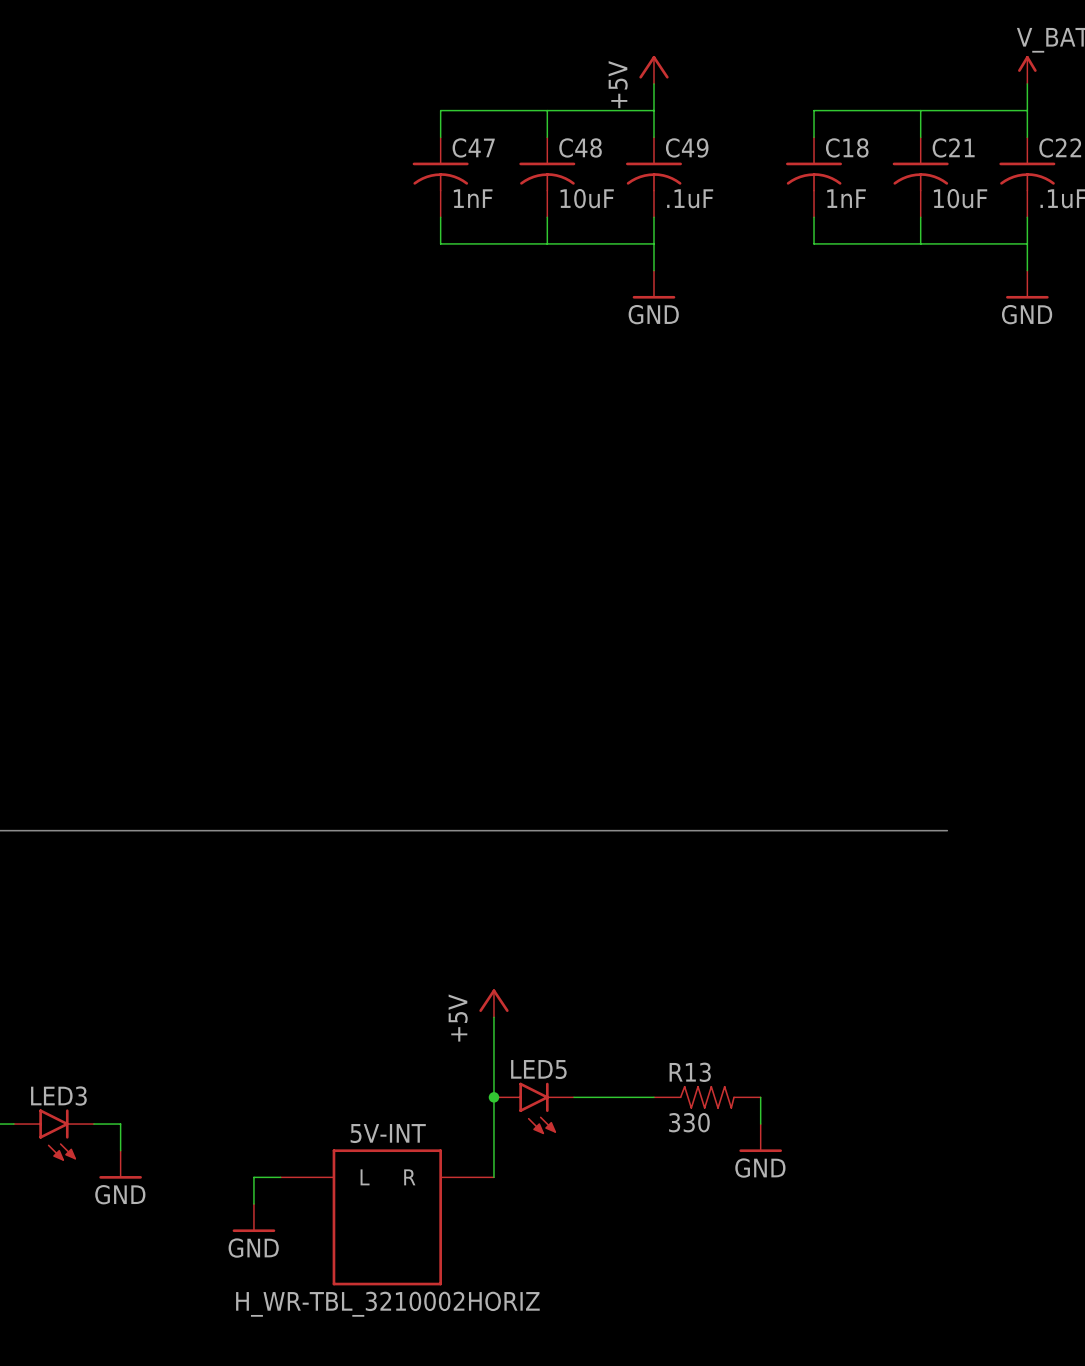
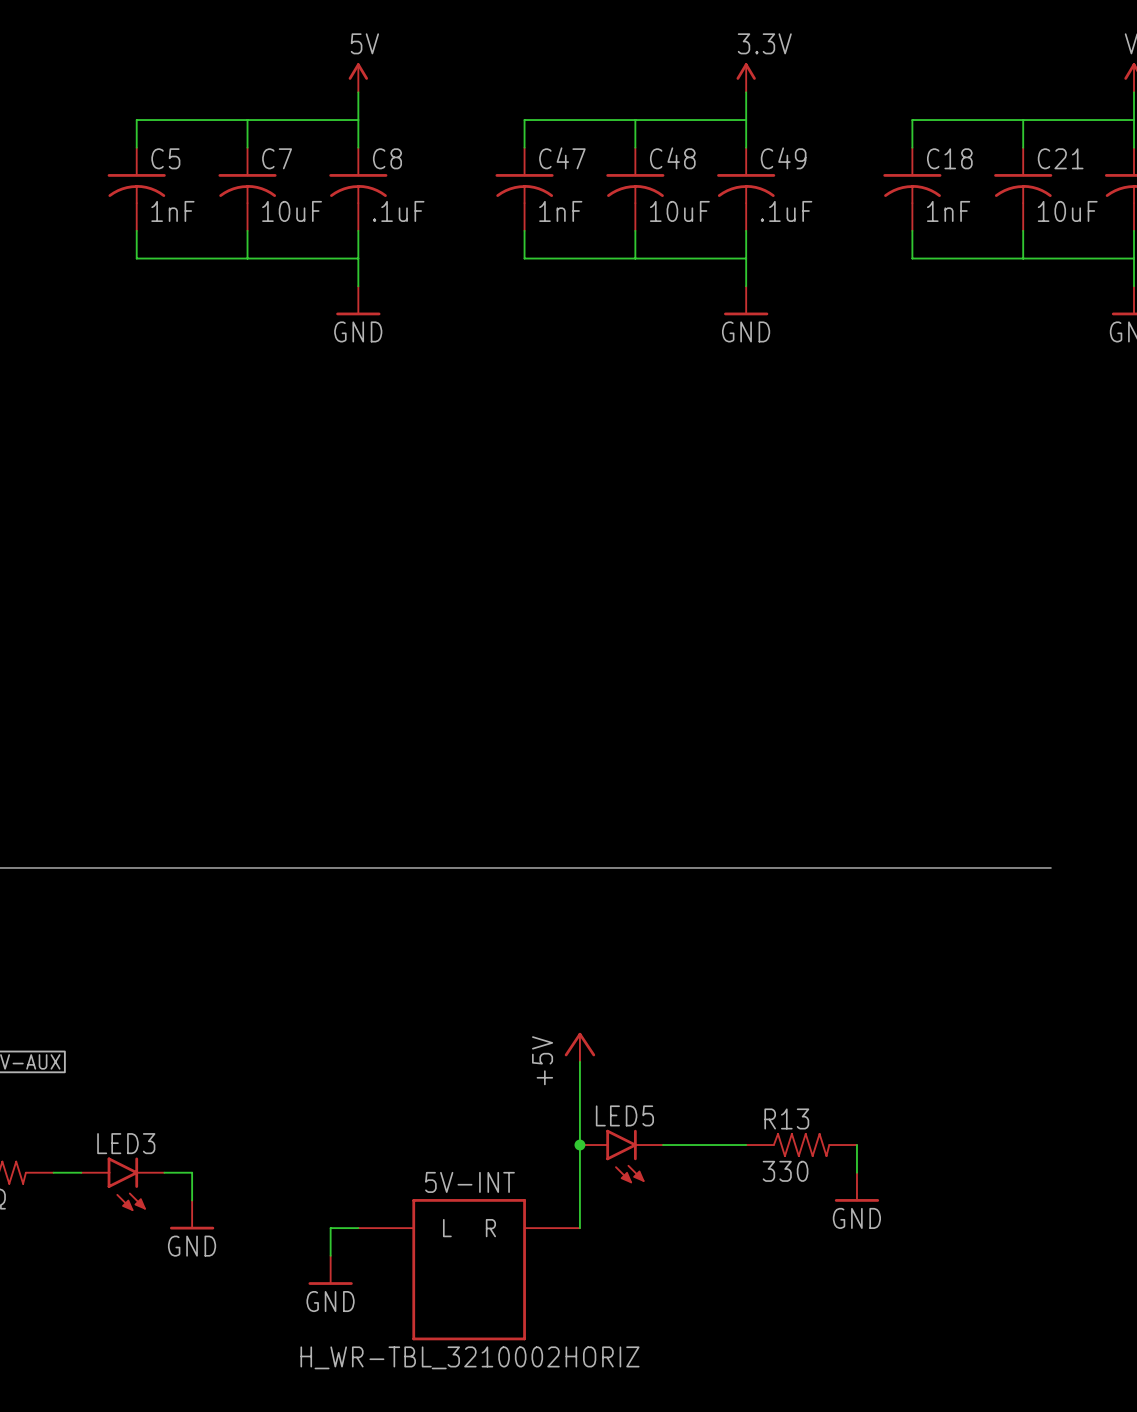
power symbol: none -> 5V (358, 77)
power symbol: +5V (653, 69) -> 3.3V (746, 77)
wire: none -> (358, 92) (358, 147)
wire: none -> (247, 120) (247, 147)
wire: none -> (358, 120) (136, 120) (136, 147)
C5: none -> 1nF (136, 189)
C7: none -> 10uF (247, 189)
C8: none -> .1uF (358, 189)
wire: none -> (136, 230) (136, 258) (358, 258)
wire: none -> (247, 230) (247, 258)
wire: none -> (358, 230) (358, 286)
power symbol: none -> GND (358, 300)

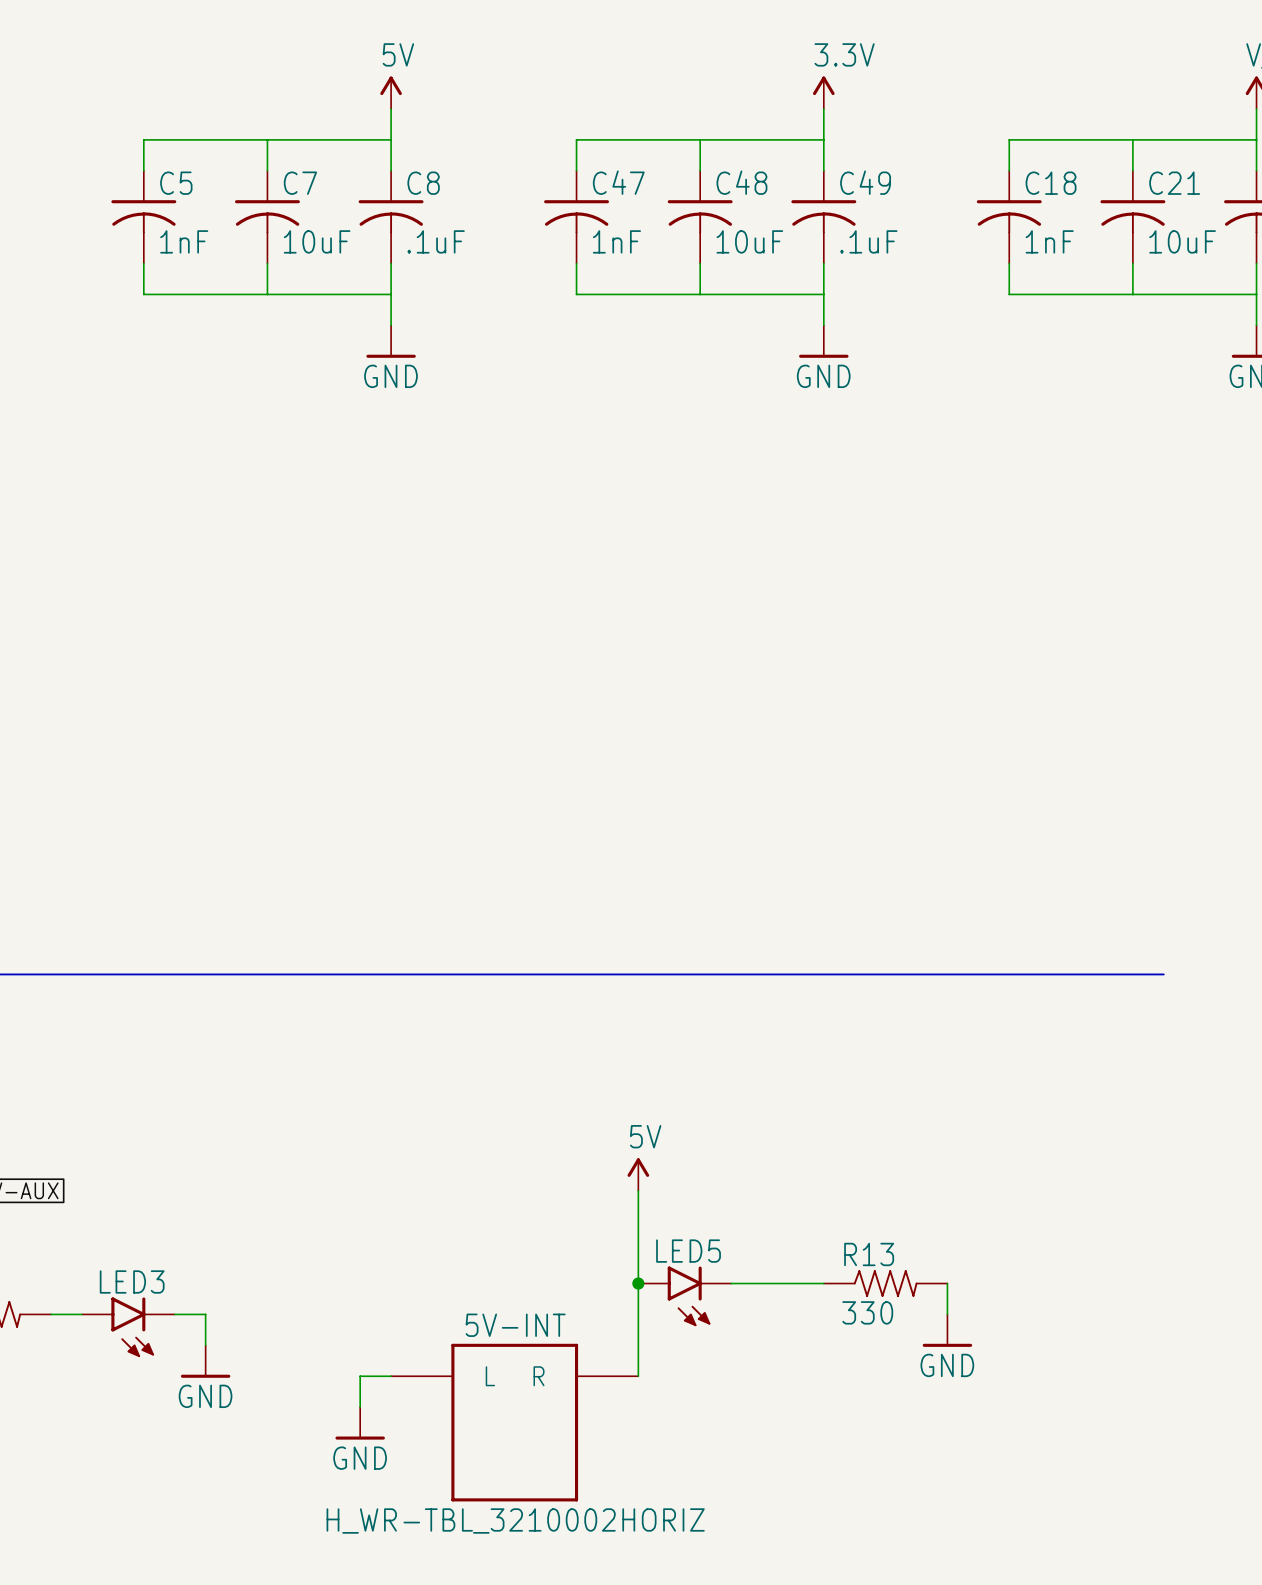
power symbol: +5V (579, 1047) -> 5V (638, 1174)

